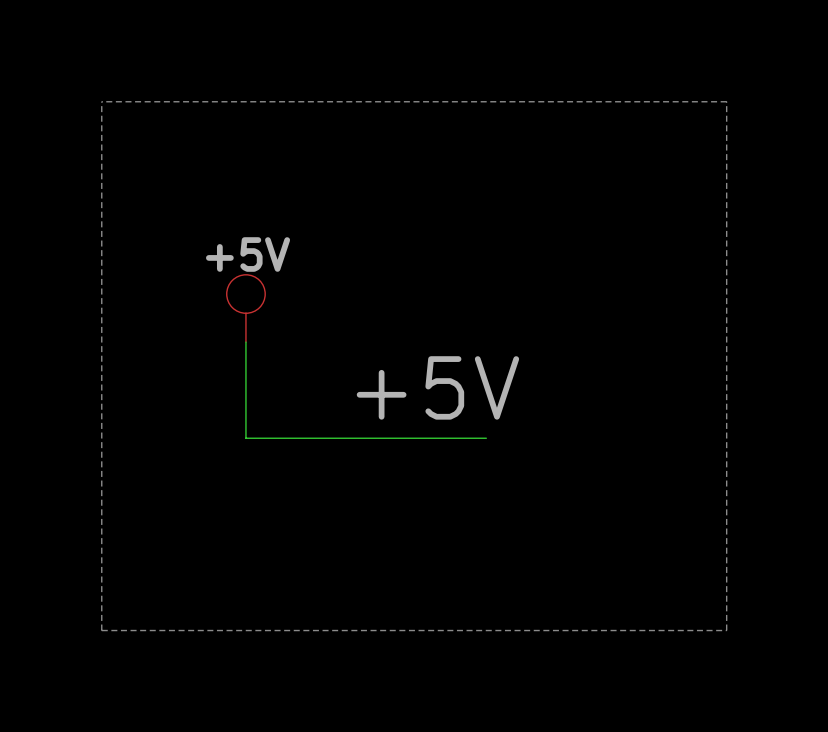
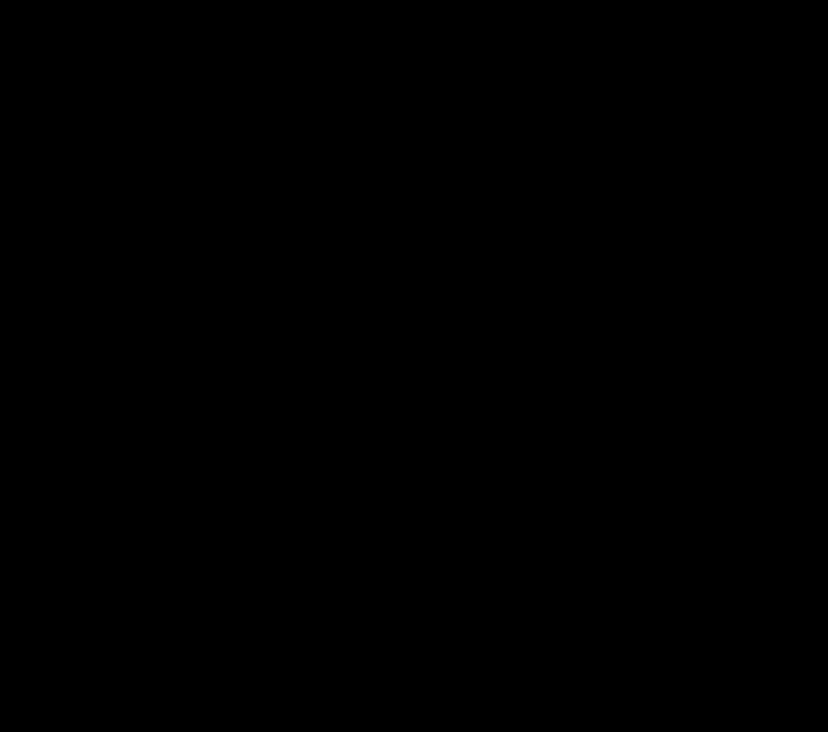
line: (101, 101) (101, 630) (726, 630) (726, 101) (101, 101) -> none
power symbol: +5V (245, 308) -> none
wire: (245, 342) (245, 438) (486, 438) -> none
label: +5V (437, 387) -> none

